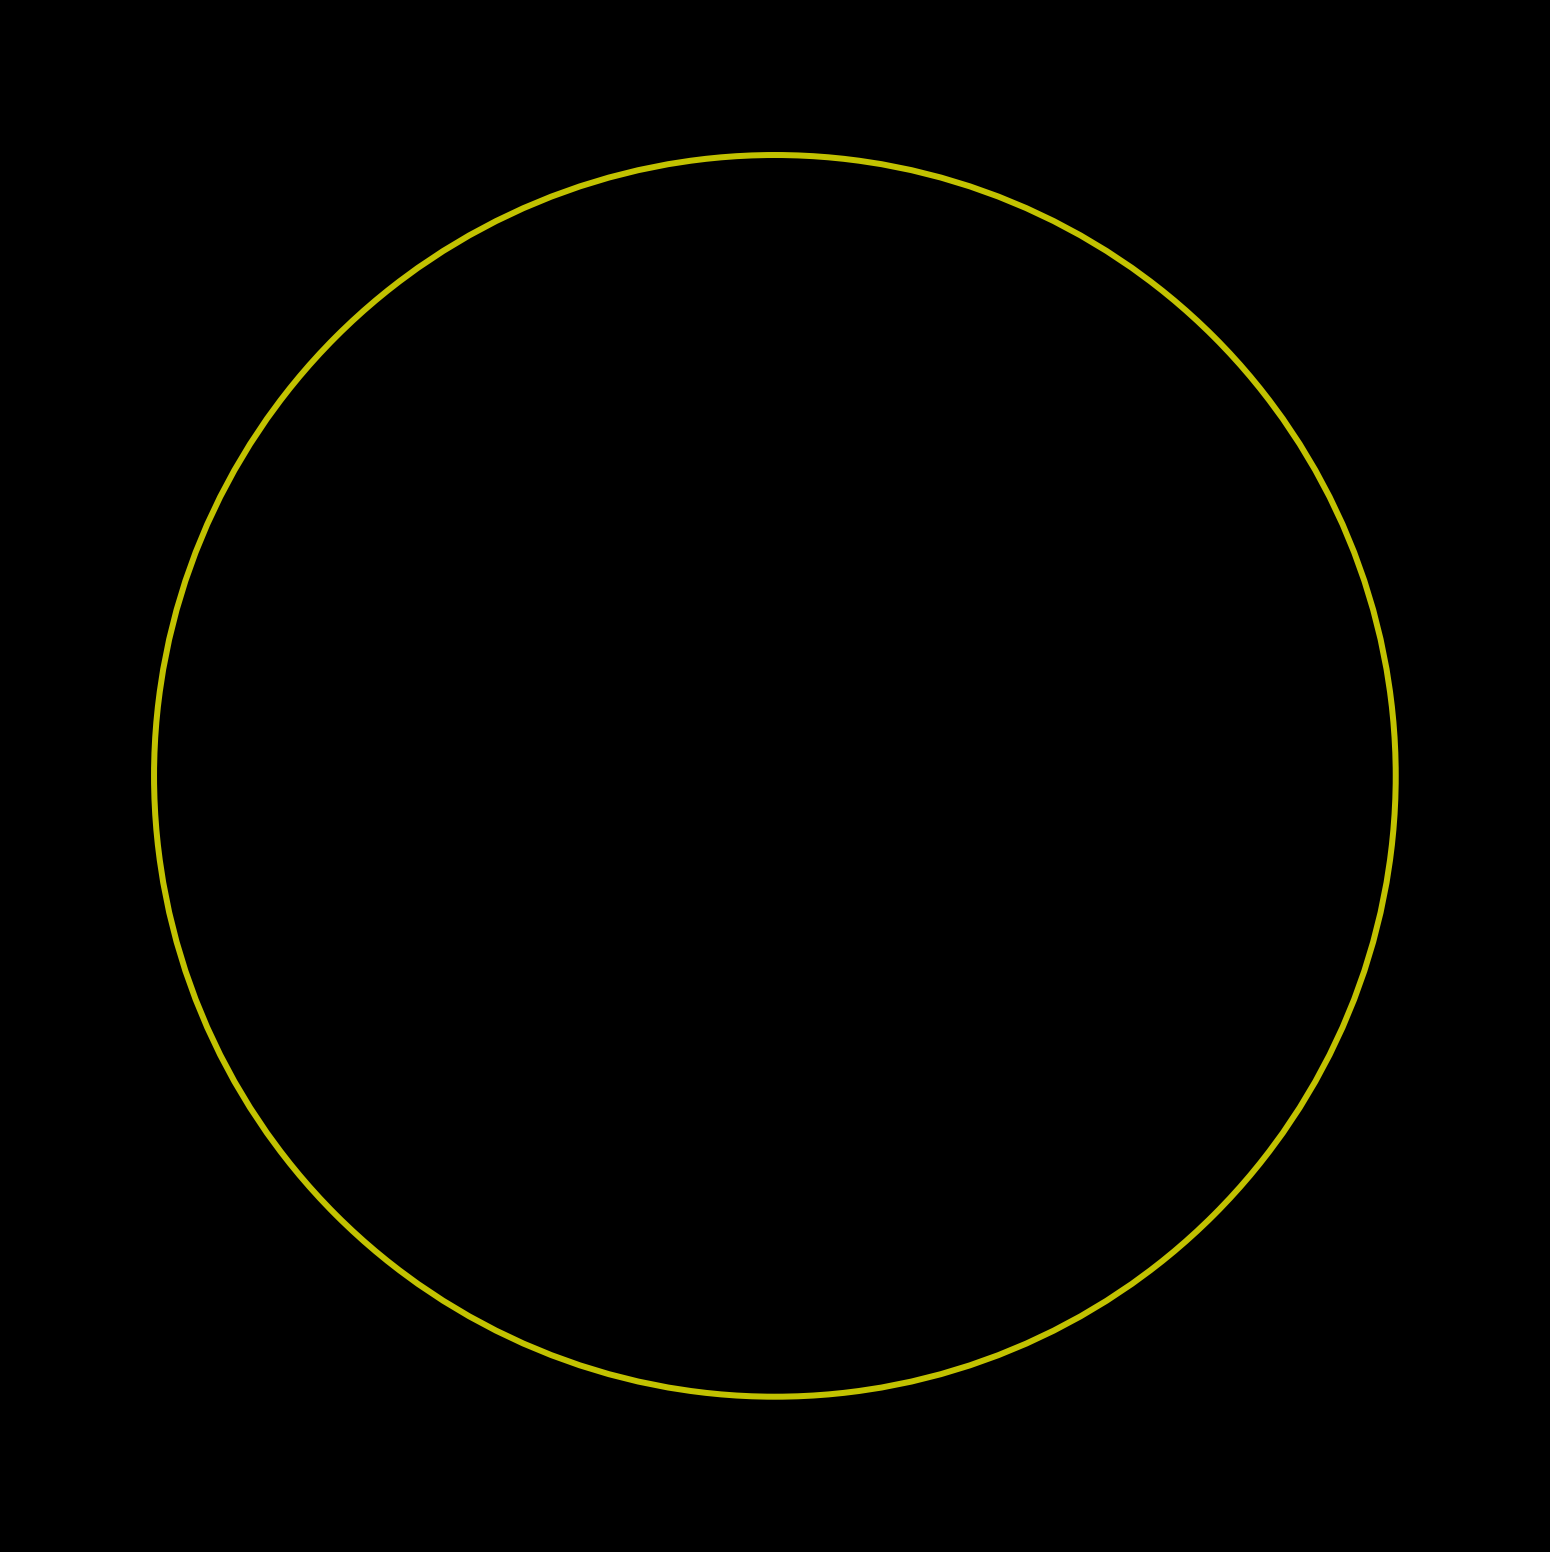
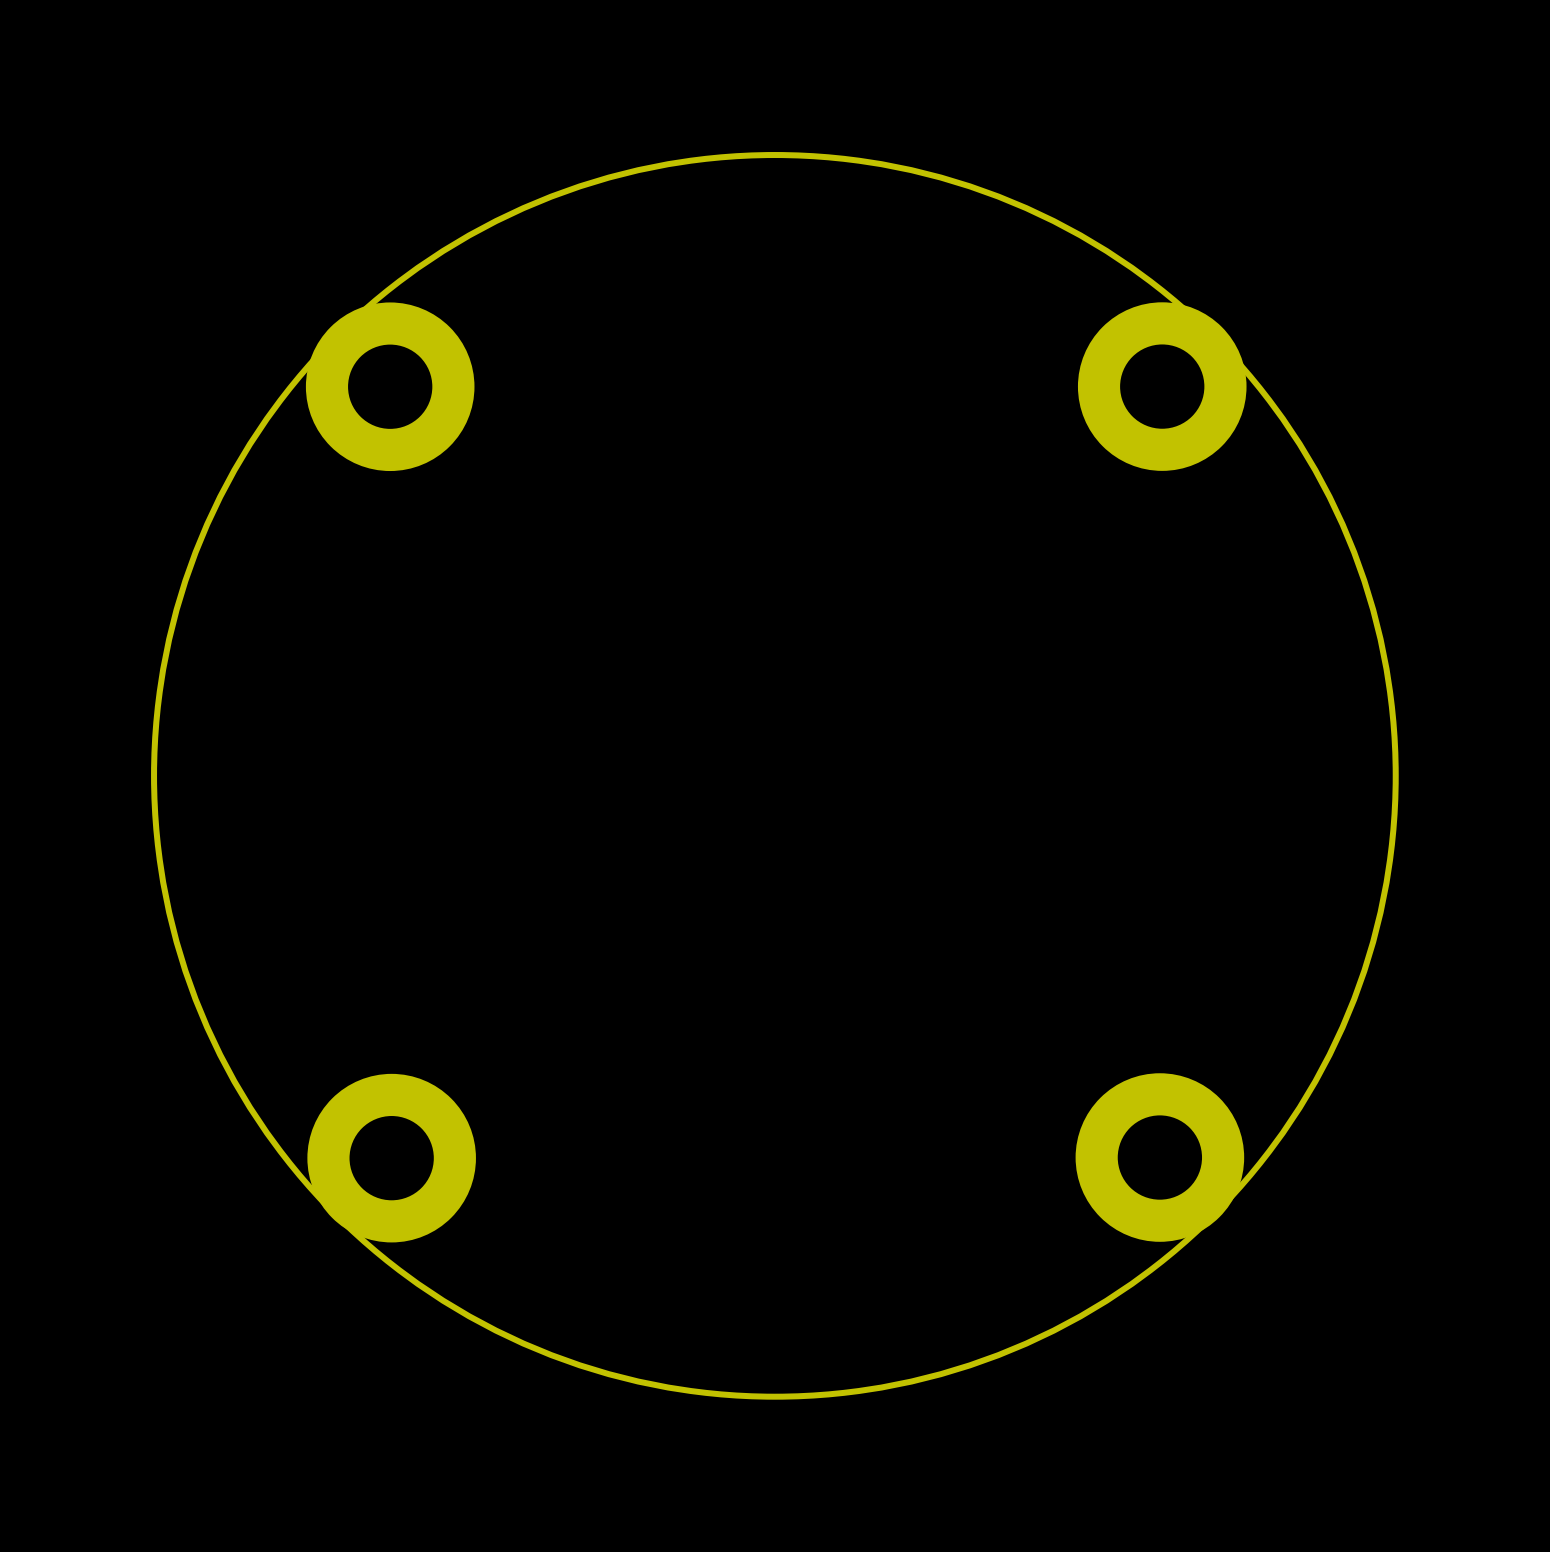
part: none -> (390, 386)
part: none -> (1162, 386)
part: none -> (1159, 1157)
part: none -> (391, 1158)

